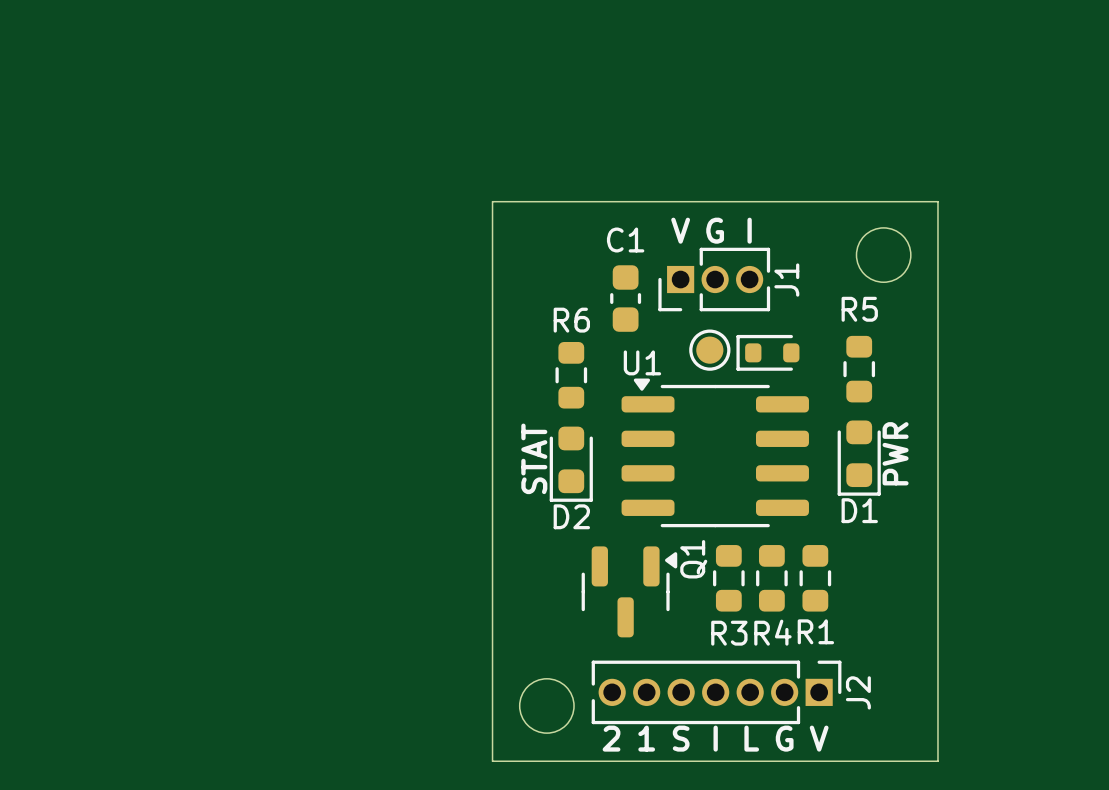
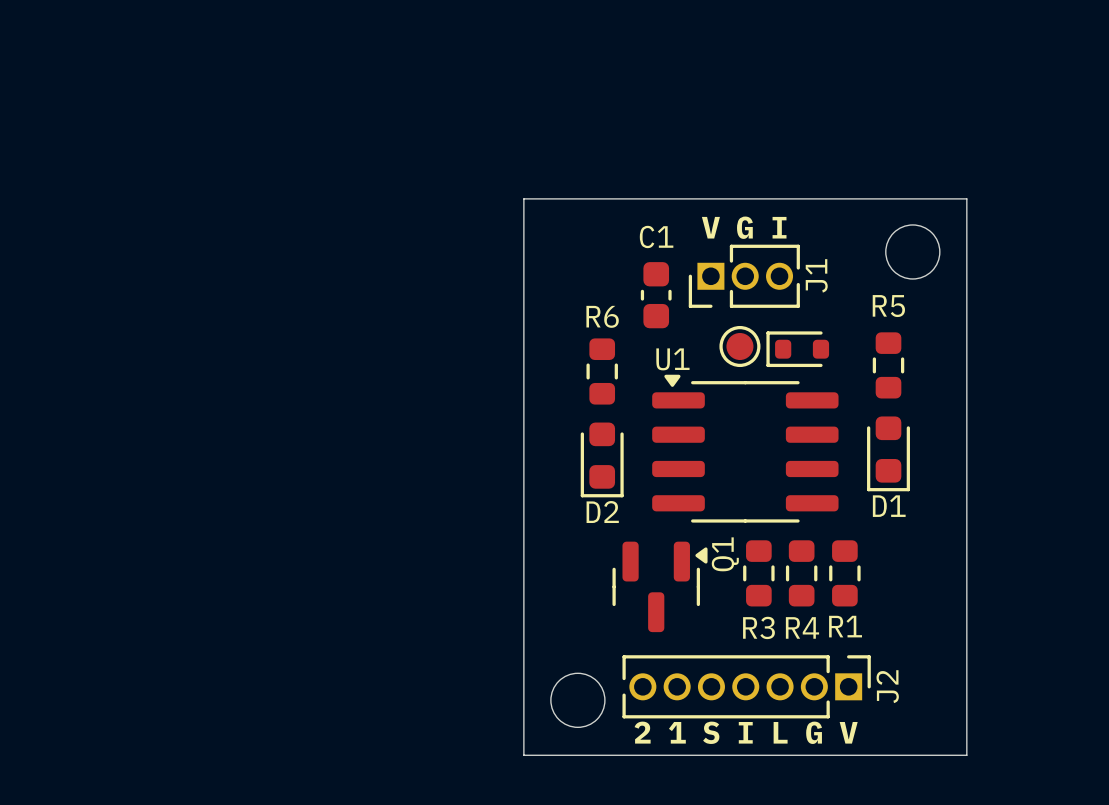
text: PWR (895, 453) -> none
text: STAT (534, 458) -> none

